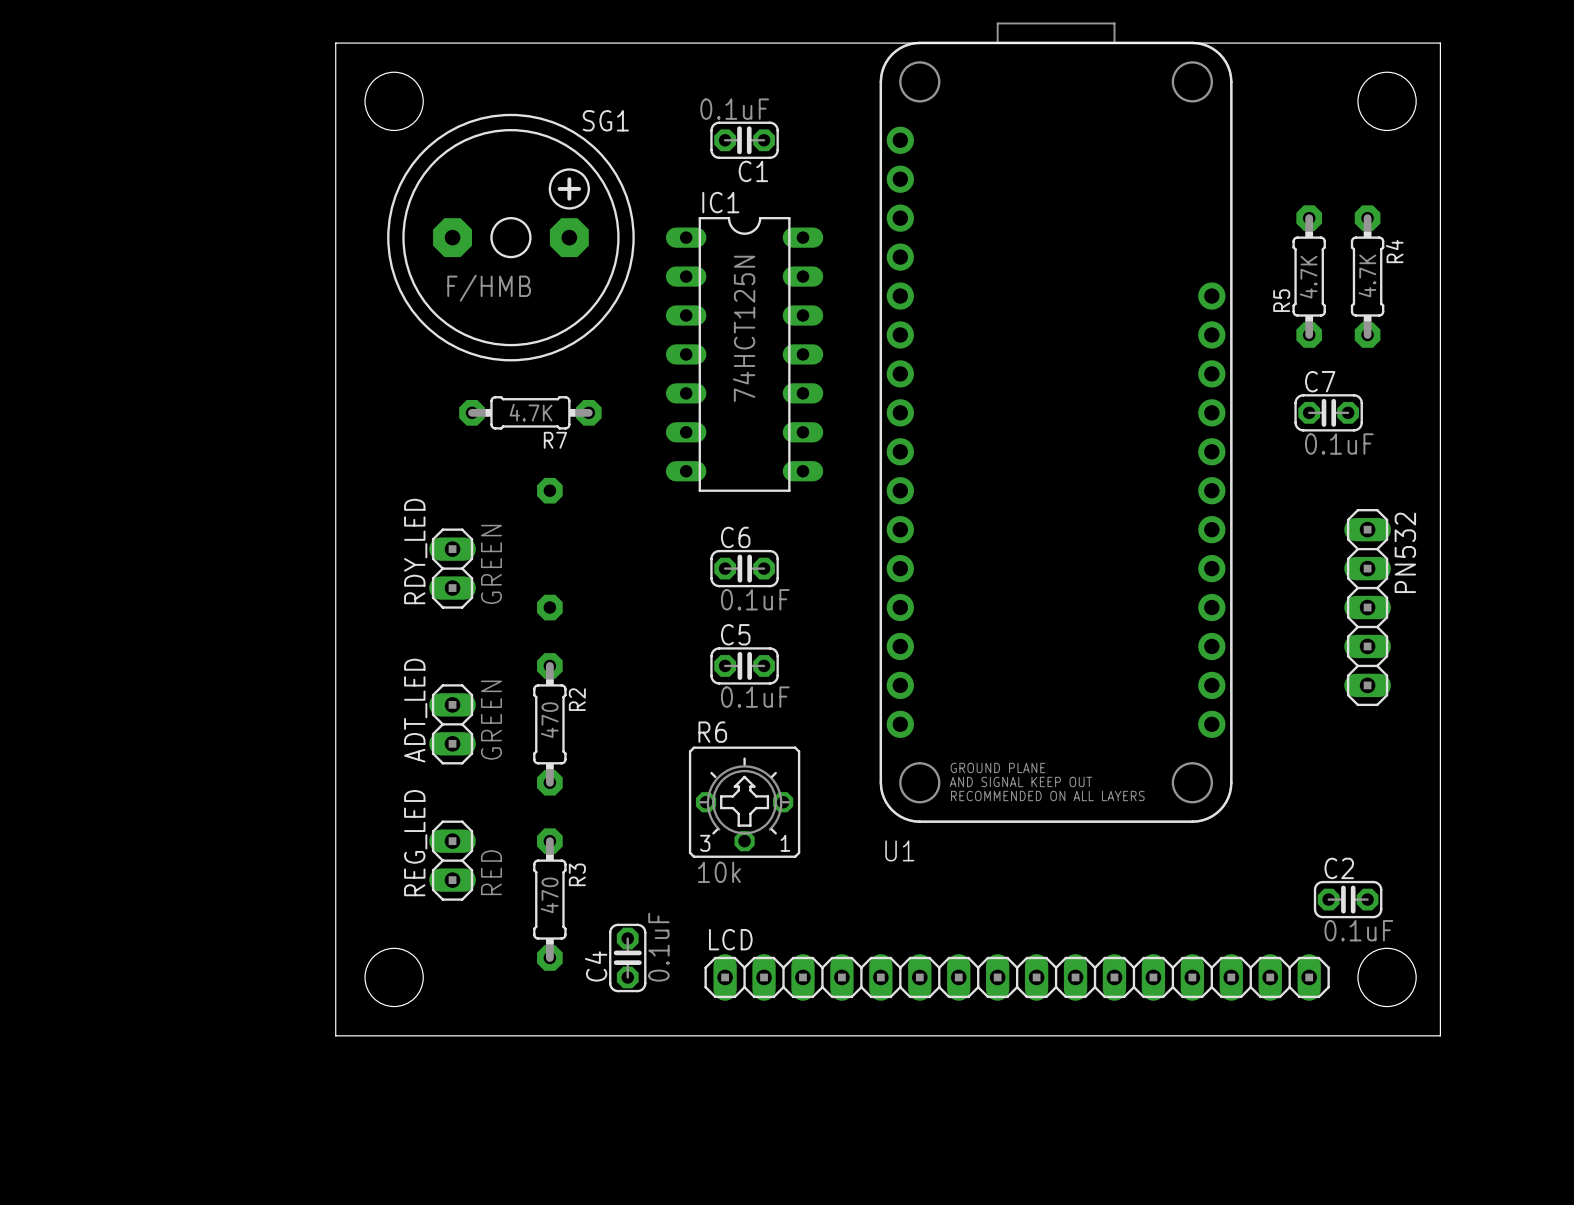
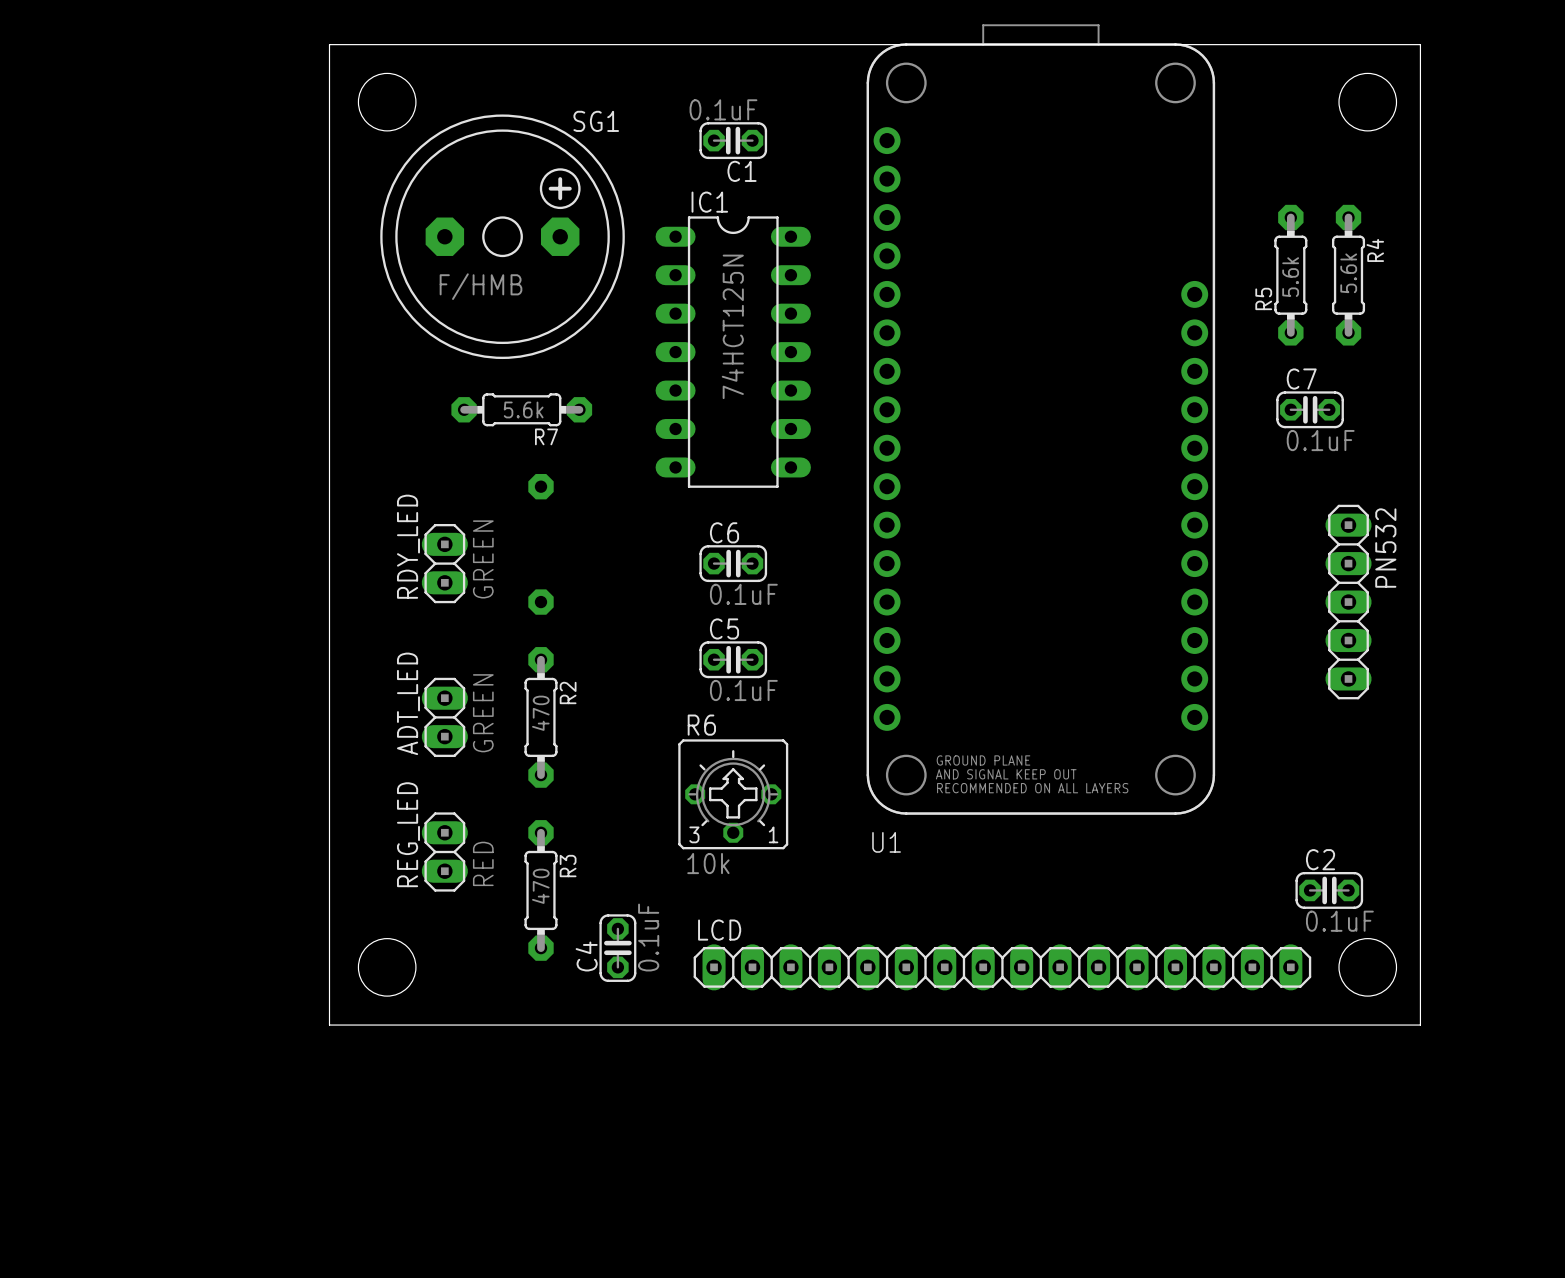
R4 value: 4.7K (1367, 275) -> 5.6k (1348, 273)
R5 value: 4.7K (1308, 277) -> 5.6k (1290, 277)
R7 value: 4.7K (531, 412) -> 5.6k (523, 409)

